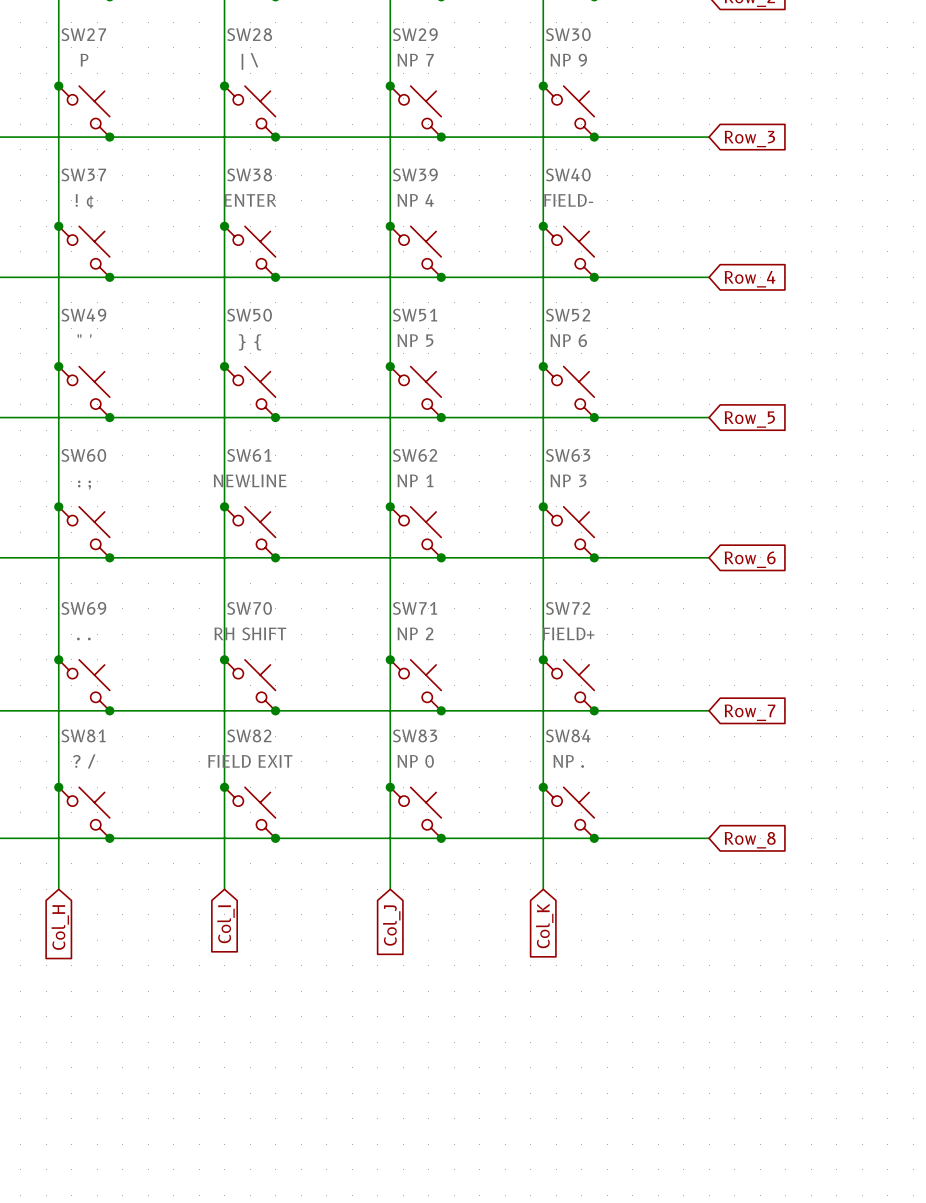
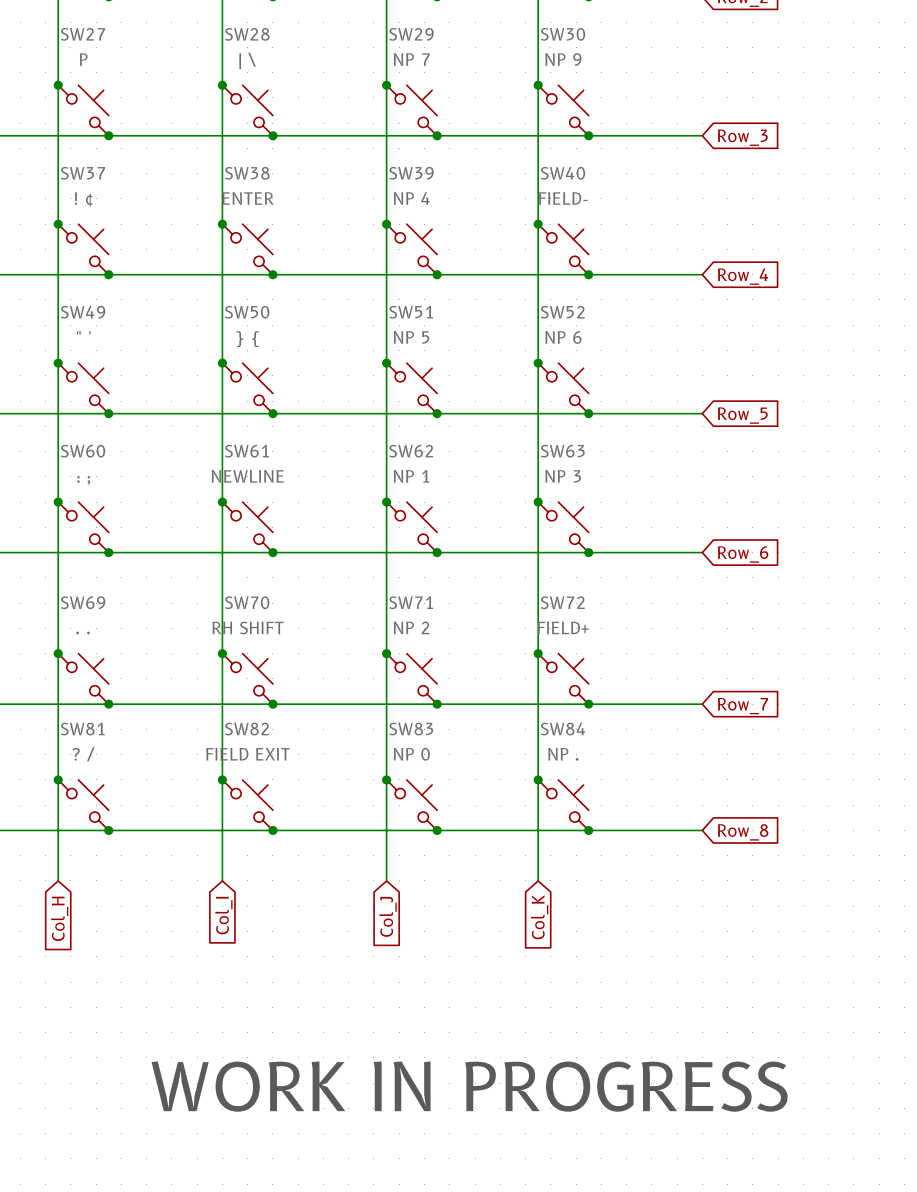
text: none -> WORK IN PROGRESS (469, 1086)

